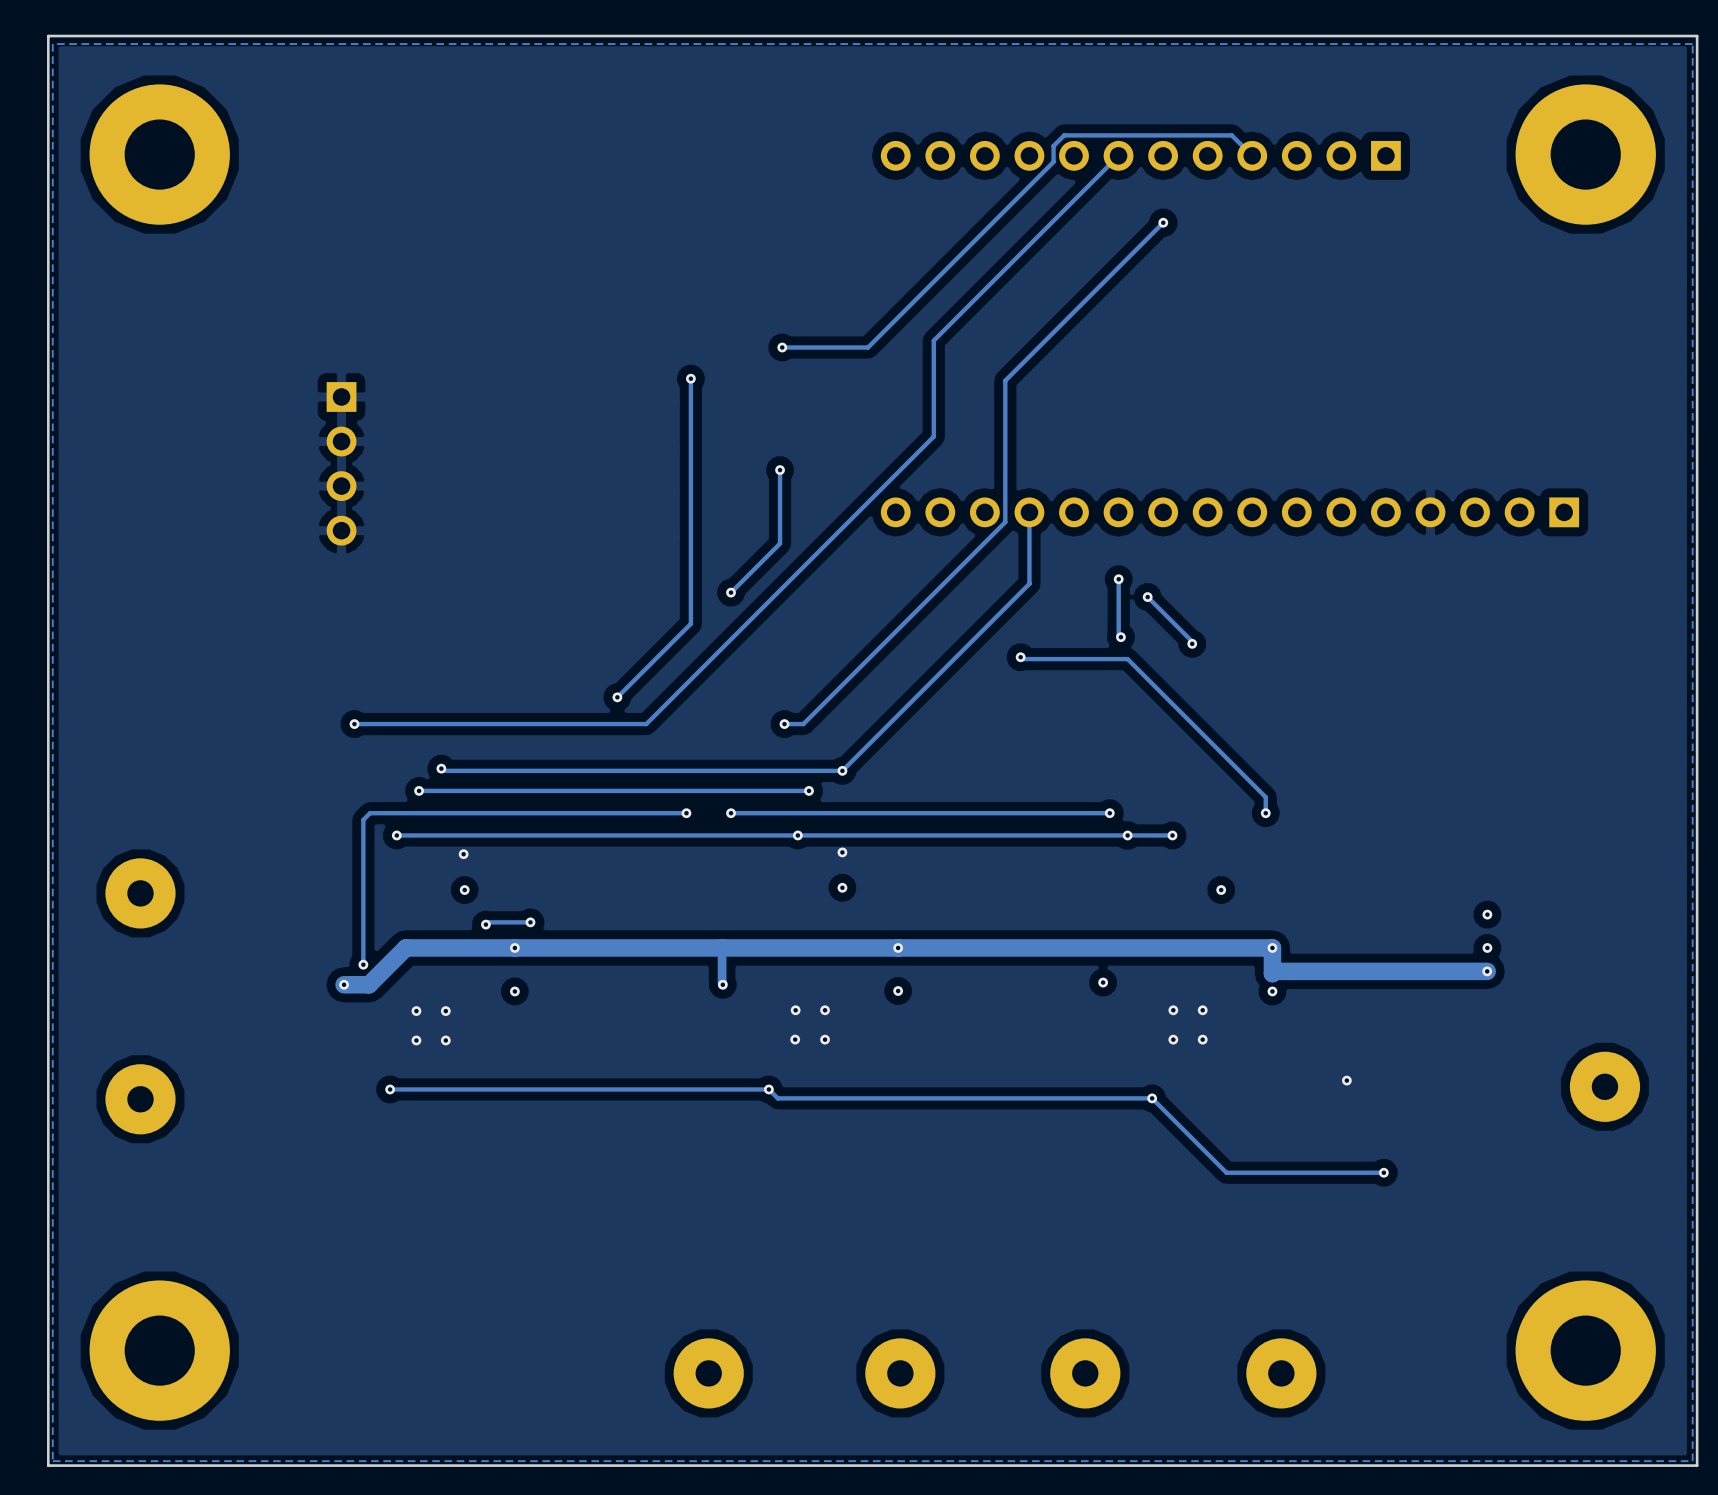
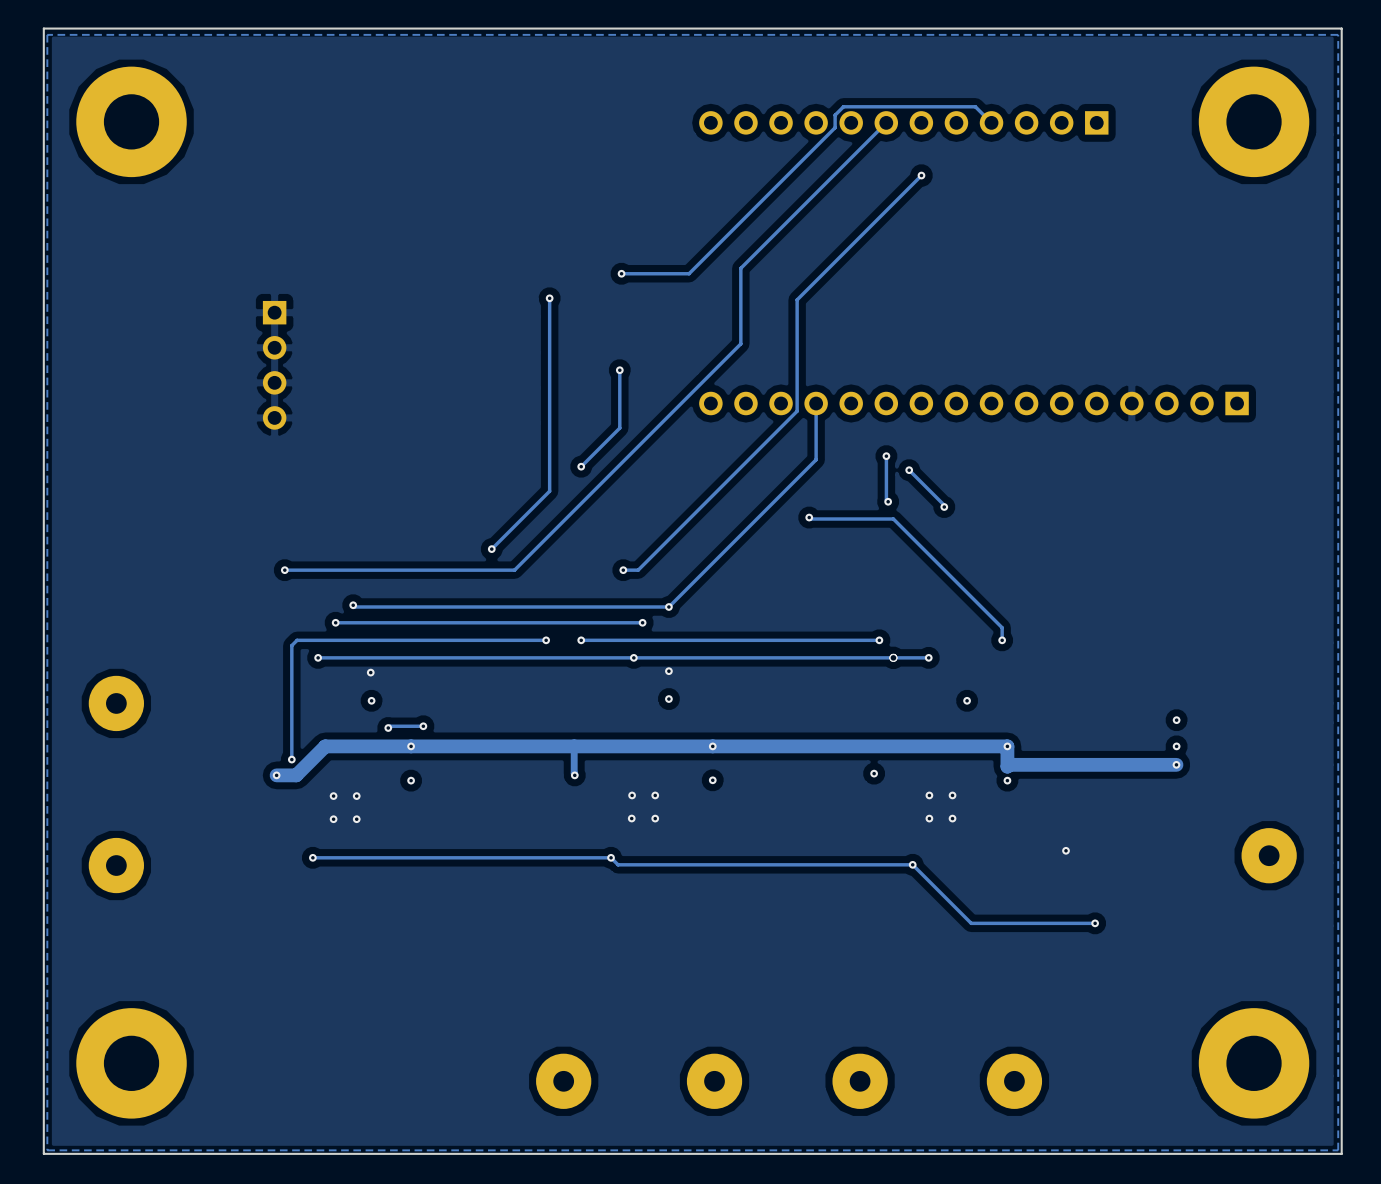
via: none -> (893, 657)

